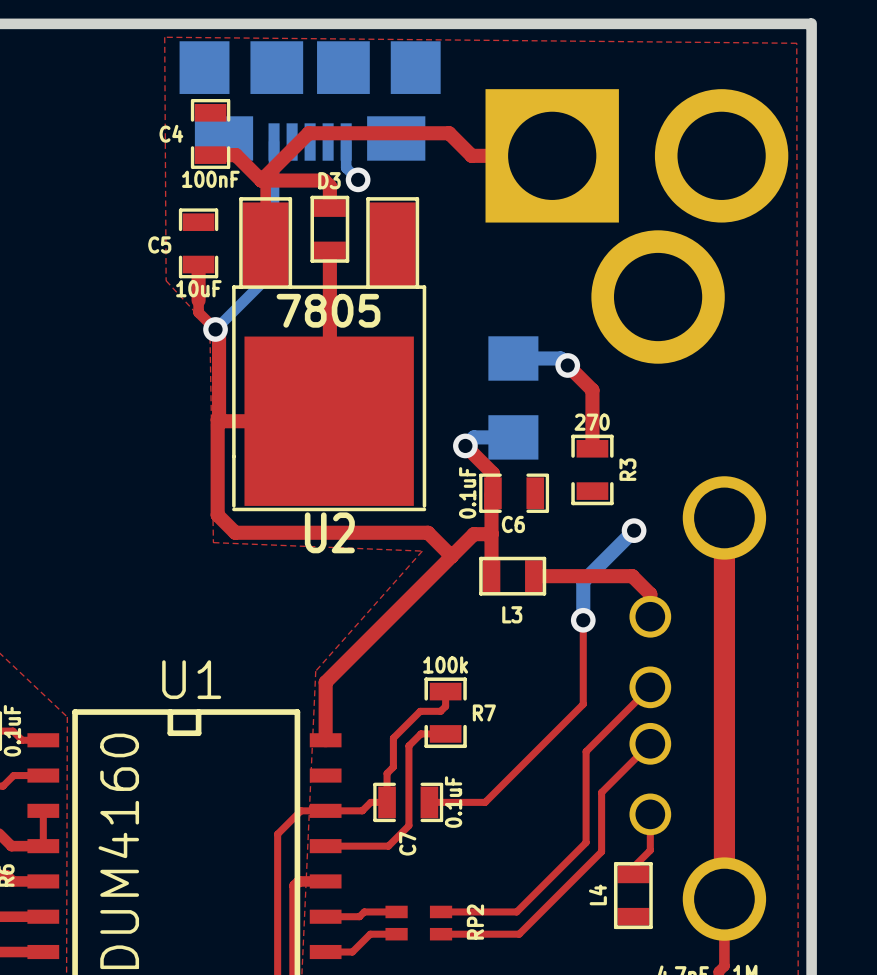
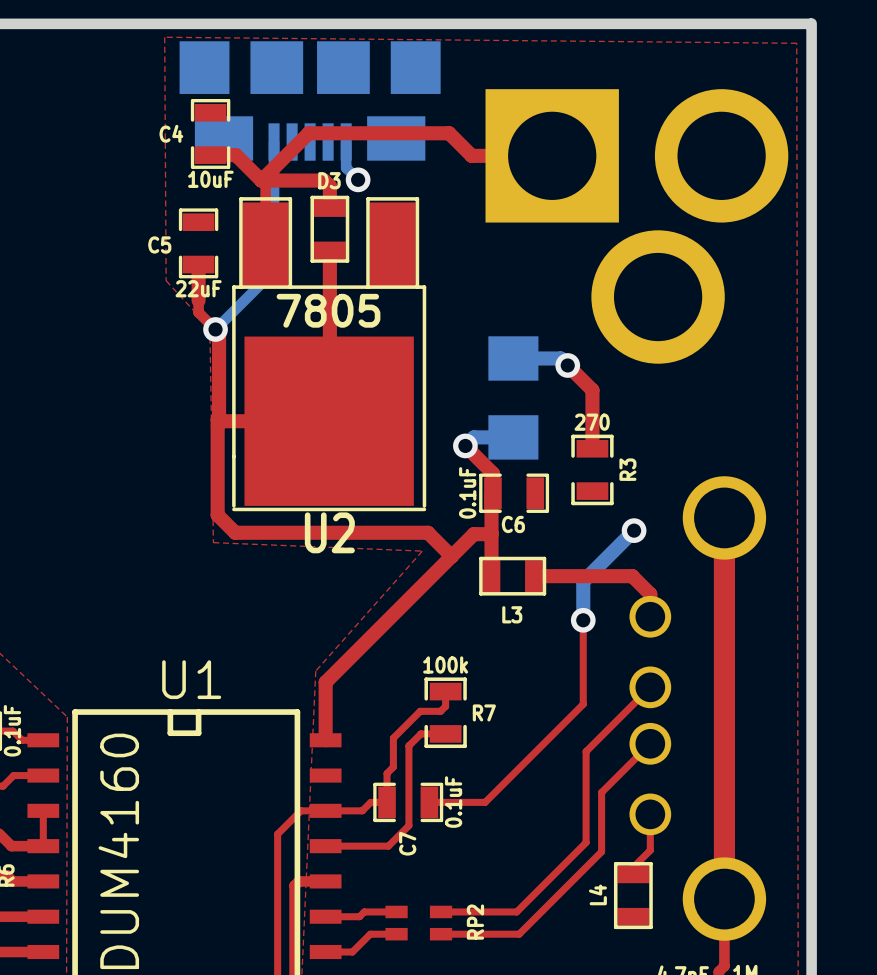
C4 value: 100nF (210, 179) -> 10uF (210, 179)
C5 value: 10uF (198, 288) -> 22uF (198, 288)

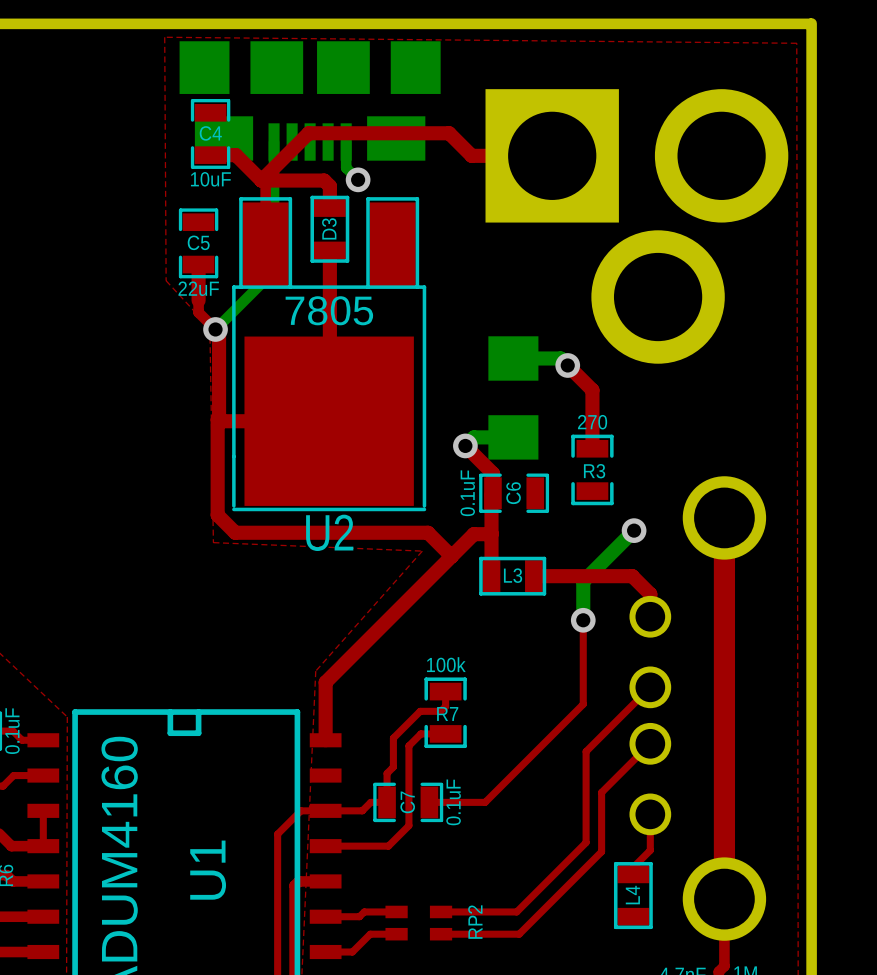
C4 name position: C4 (171, 133) -> C4 (210, 133)
D3 name rotation: 0° (329, 180) -> 90° counterclockwise (329, 228)
D3 name position: D3 (329, 180) -> D3 (329, 228)
C5 name position: C5 (159, 244) -> C5 (198, 242)
R3 name rotation: 0° (627, 469) -> 90° clockwise (594, 471)
R3 name position: R3 (627, 469) -> R3 (594, 471)
C6 name rotation: 0° (513, 524) -> 90° counterclockwise (513, 493)
C6 name position: C6 (513, 524) -> C6 (513, 493)
L3 name position: L3 (512, 614) -> L3 (513, 575)
U1 name rotation: 0° (191, 679) -> 90° counterclockwise (208, 870)
U1 name position: U1 (191, 679) -> U1 (208, 870)
R7 name position: R7 (484, 712) -> R7 (447, 713)
C7 name position: C7 (407, 843) -> C7 (407, 802)
L4 name position: L4 (597, 894) -> L4 (632, 895)

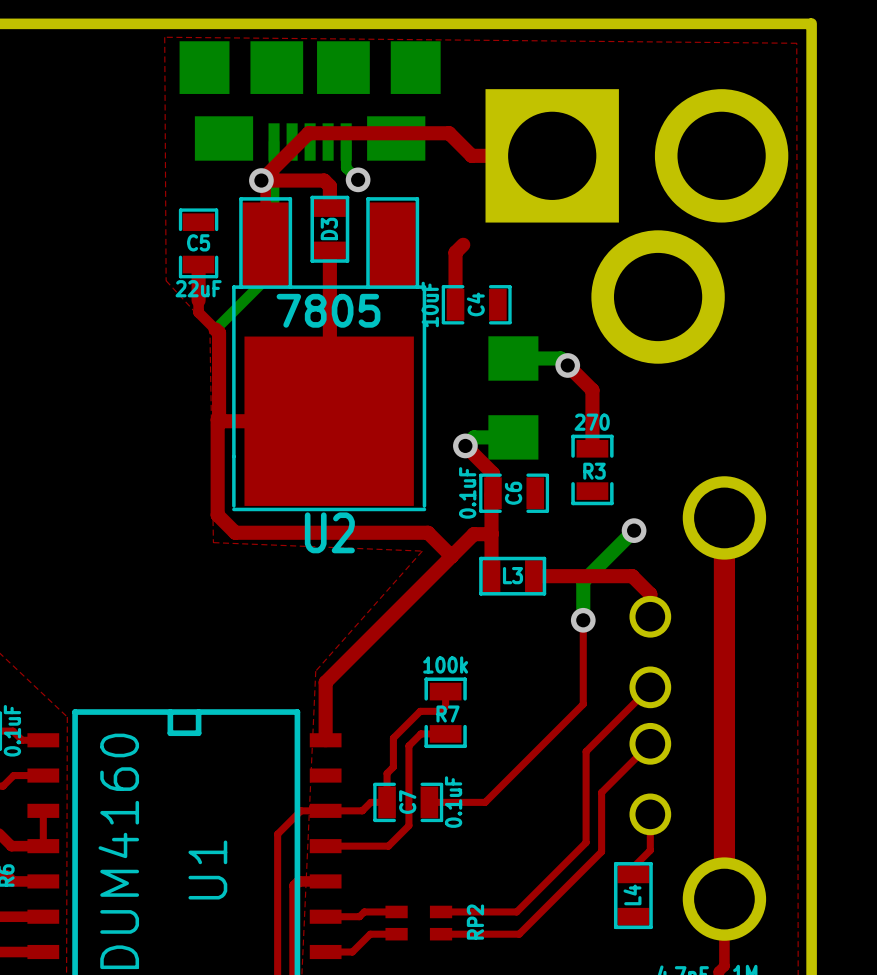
C4 rotation: 0° (210, 133) -> 90° clockwise (476, 304)
C4 position: (210, 133) -> (476, 304)
top track: (210, 155) (236, 155) (261, 180) -> none
top track: none -> (463, 244) (455, 252) (455, 304)
via position: (215, 329) -> (261, 180)

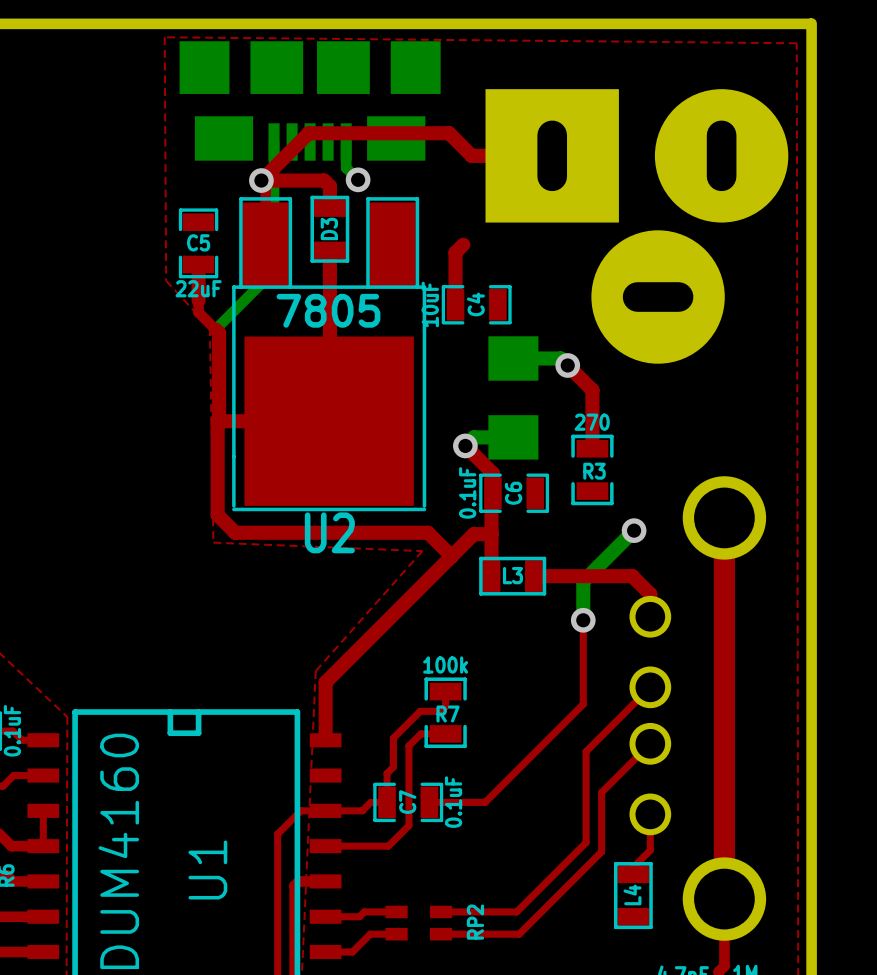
part footprint: [485, 89, 789, 364] -> [485, 89, 789, 364]

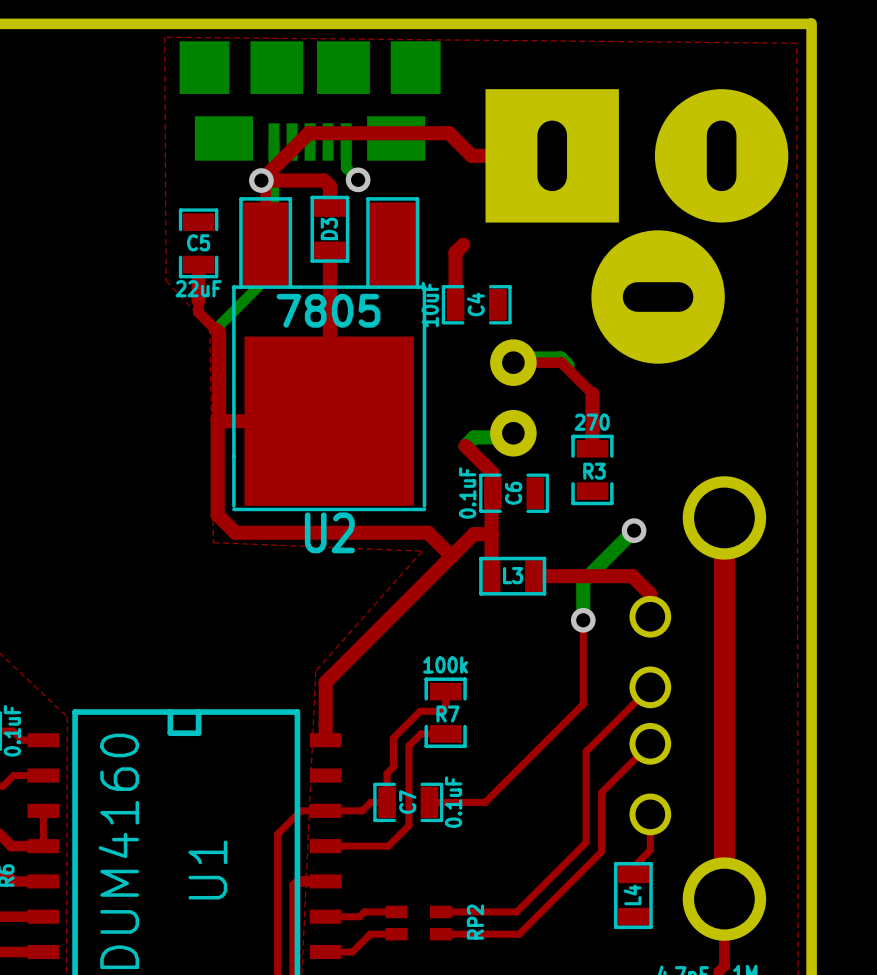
part footprint: [488, 336, 539, 460] -> [490, 339, 537, 457]
top track: (567, 365) (592, 390) (592, 393) -> (513, 362) (561, 362) (592, 393)
via: (567, 365) -> none
via: (465, 445) -> none

